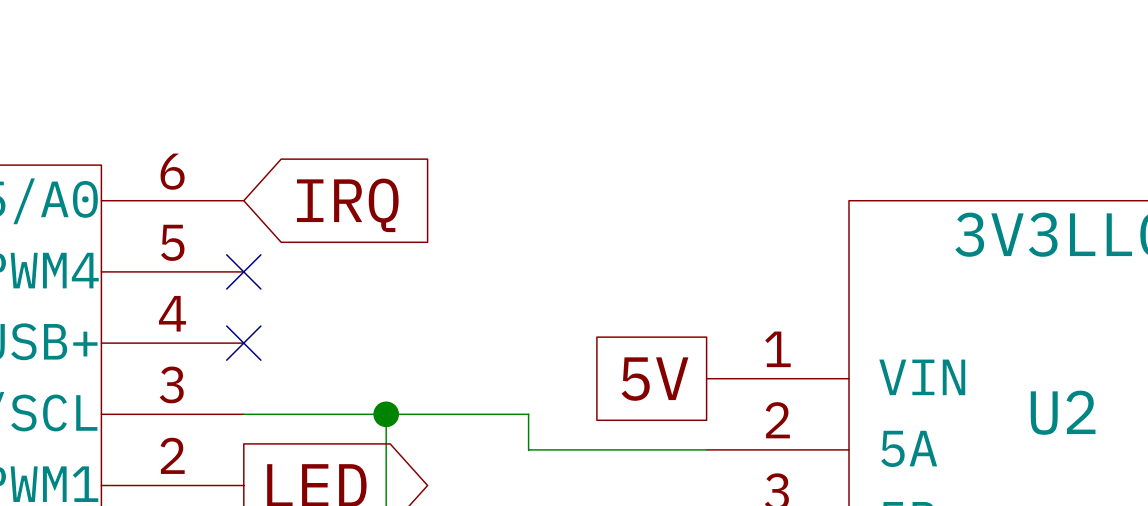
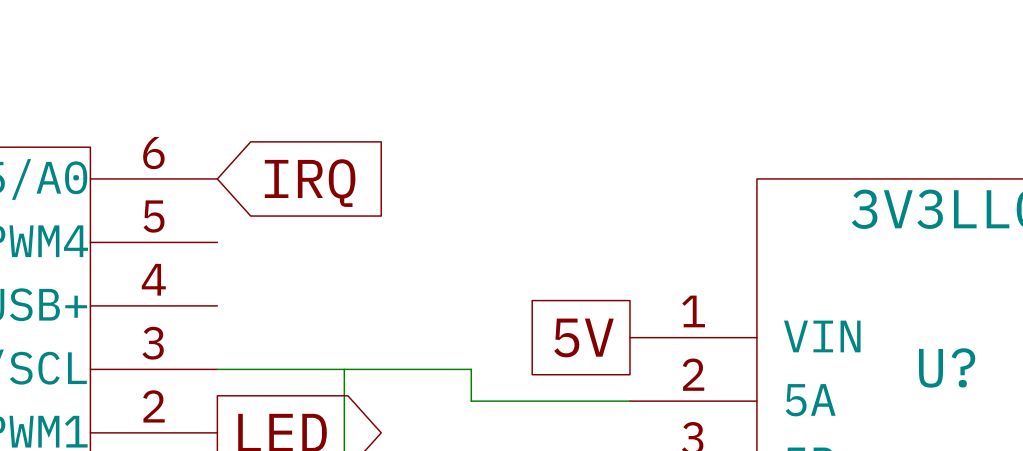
no-connect mark: (243, 271) -> none
no-connect mark: (243, 343) -> none
U2 name: U2 (1063, 412) -> U? (947, 367)
junction: (386, 414) -> none

